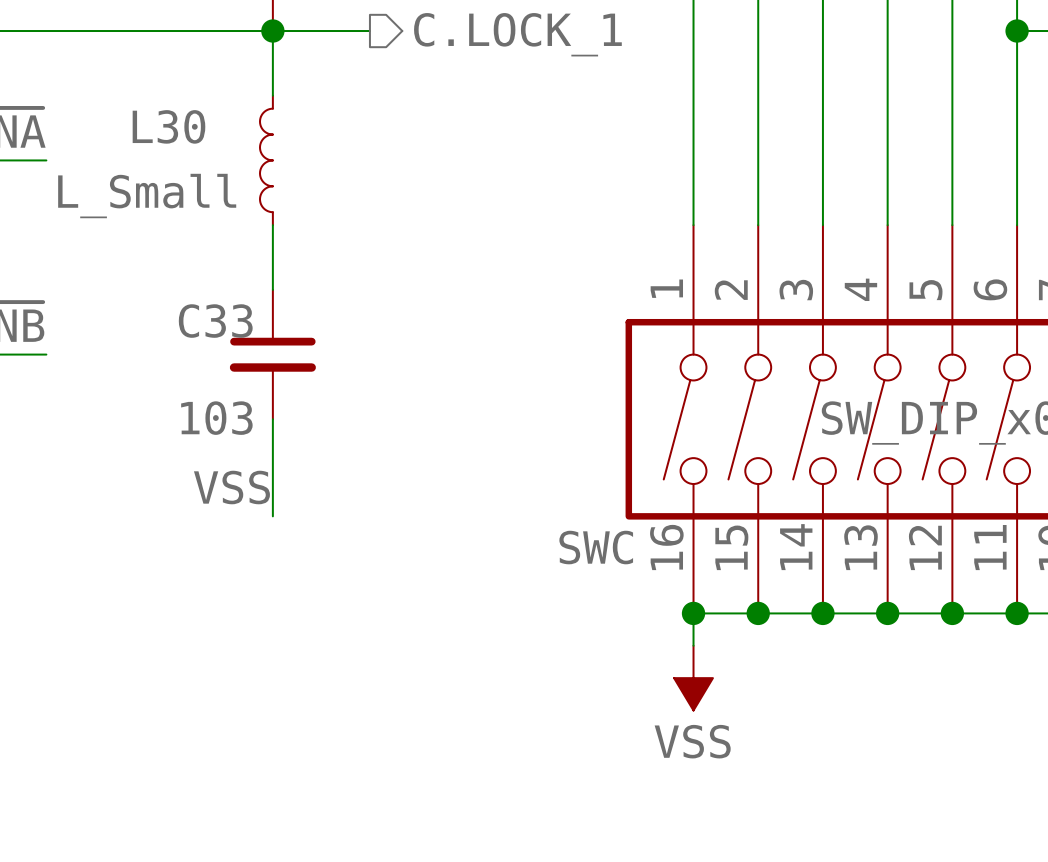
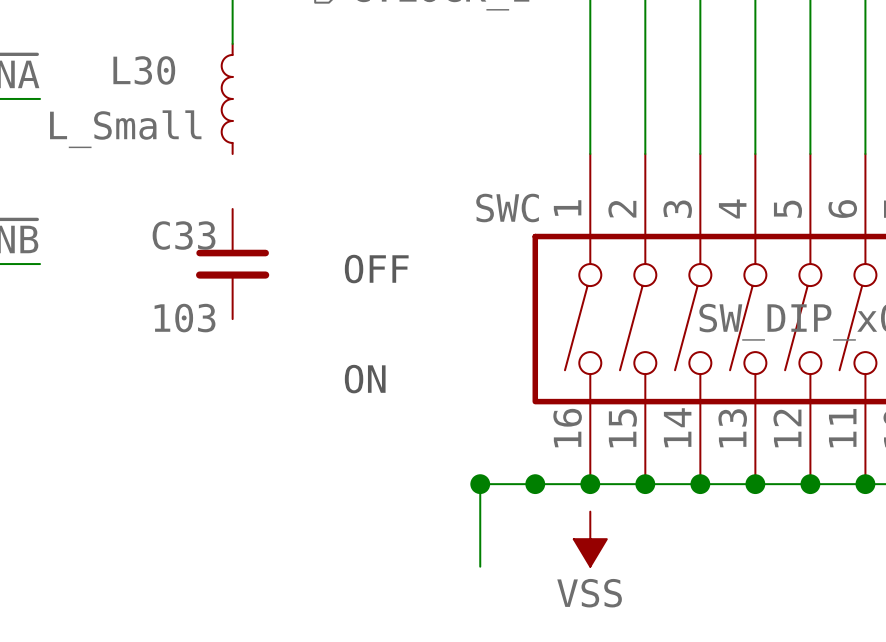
wire: (272, 225) (272, 289) -> none
text: none -> OFF (376, 269)
wire: (272, 419) (272, 516) -> none
label: VSS (231, 487) -> none
text: none -> ON (365, 379)
SWC name position: SWC (596, 547) -> SWC (507, 208)
junction: none -> (480, 484)
junction: none -> (535, 484)
wire: (693, 613) (693, 645) -> (590, 484) (480, 484) (480, 566)

